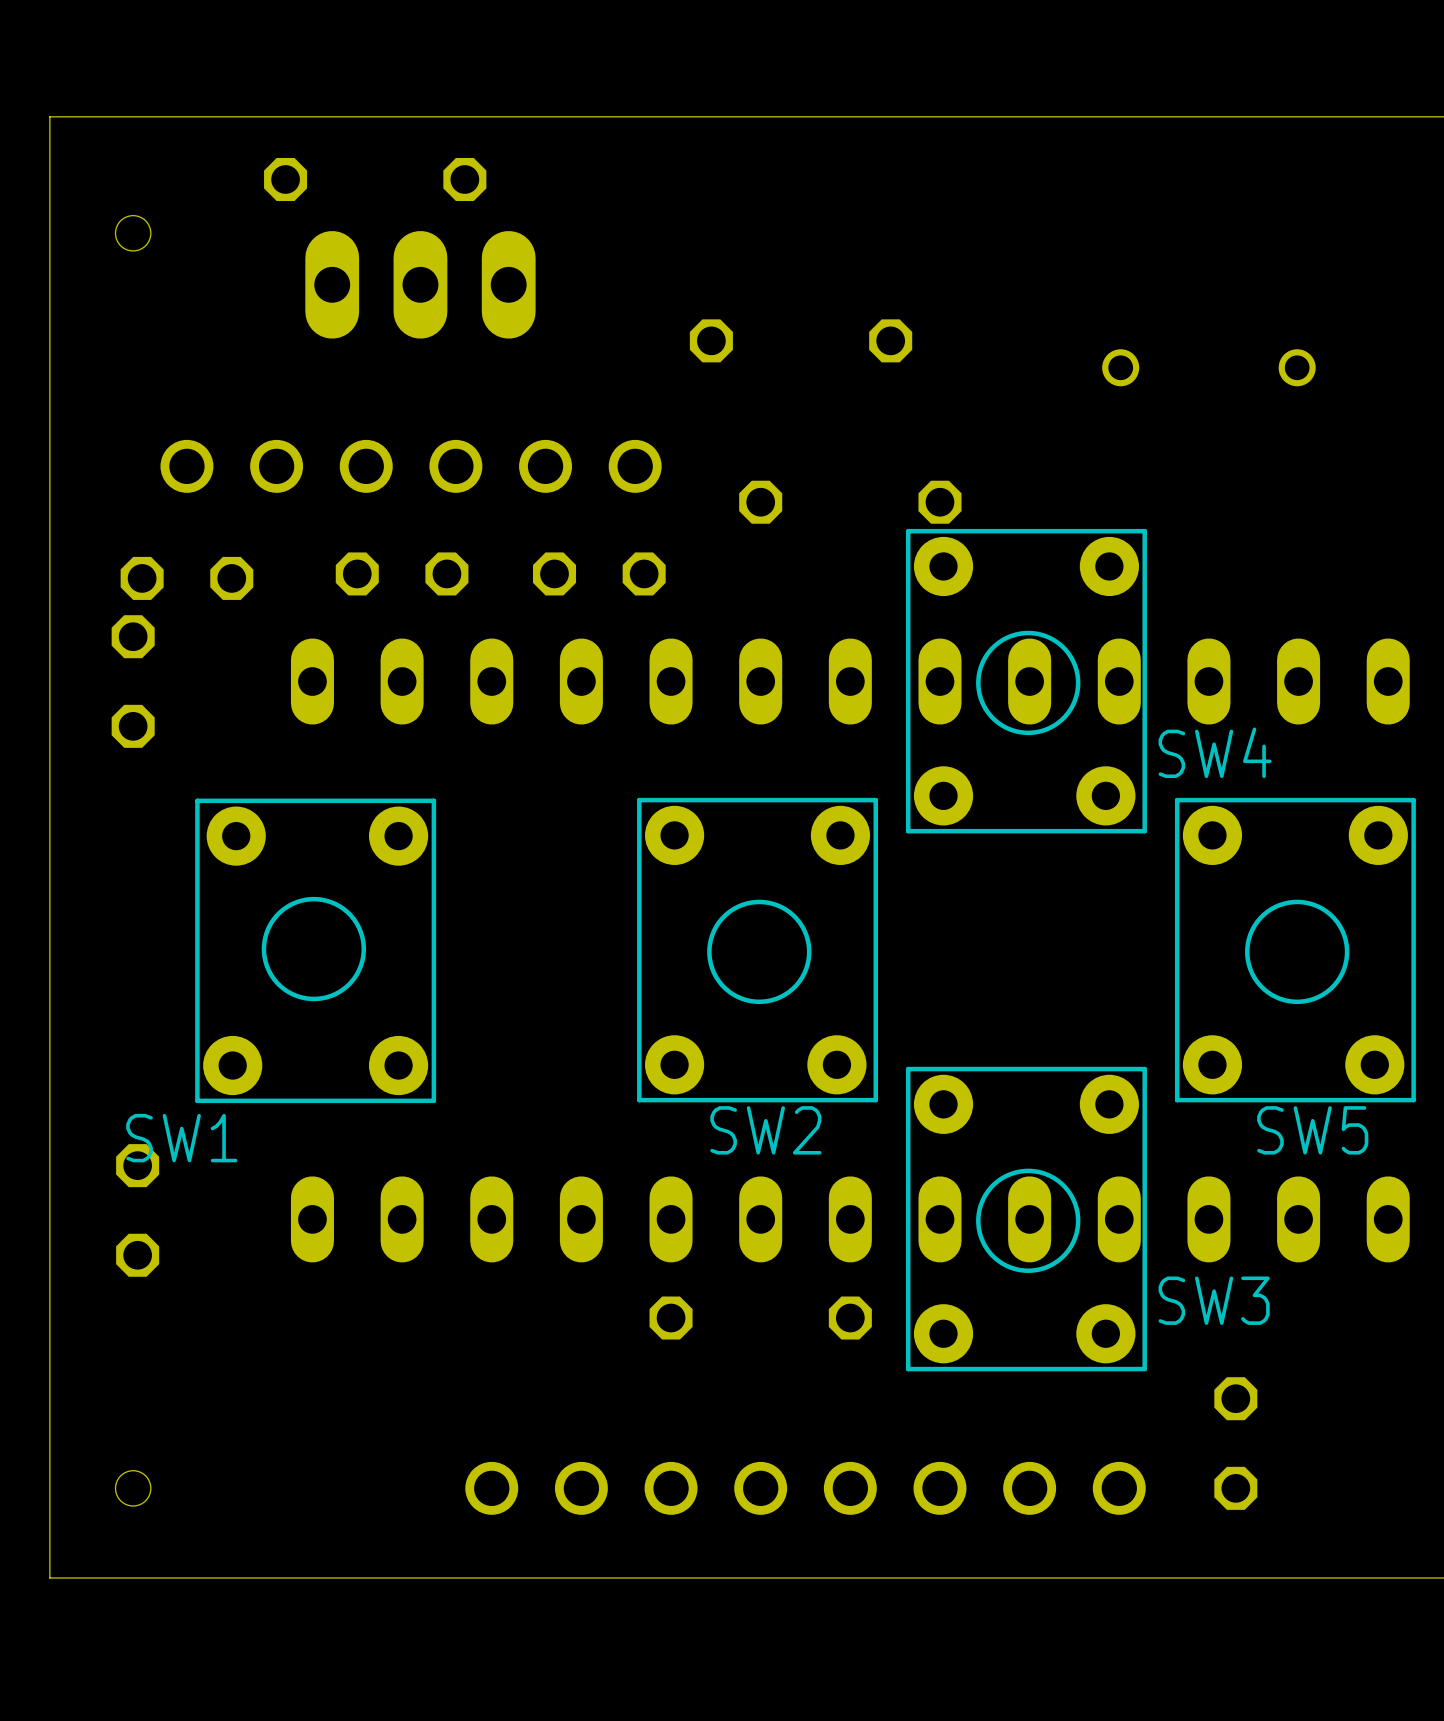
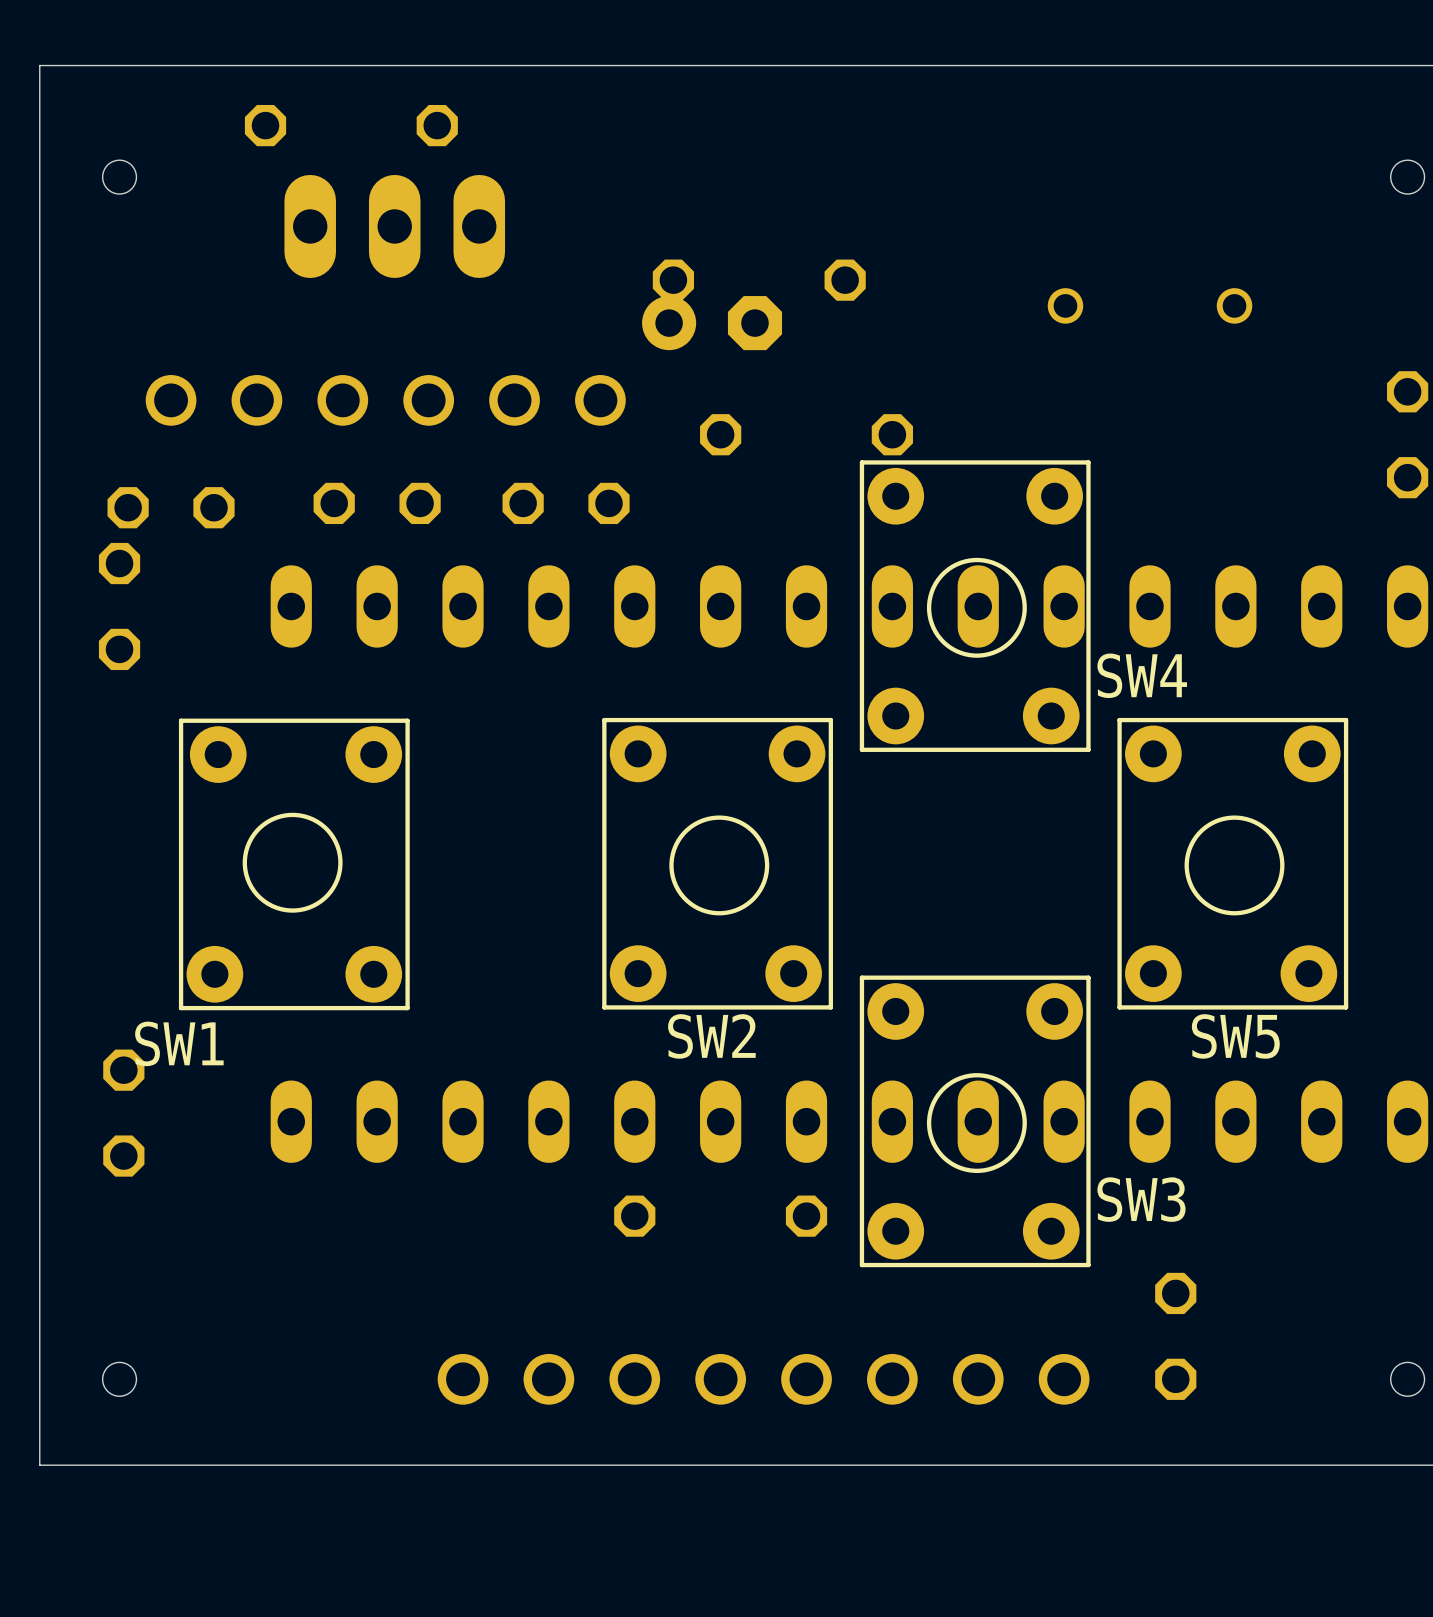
part: none -> (712, 323)

